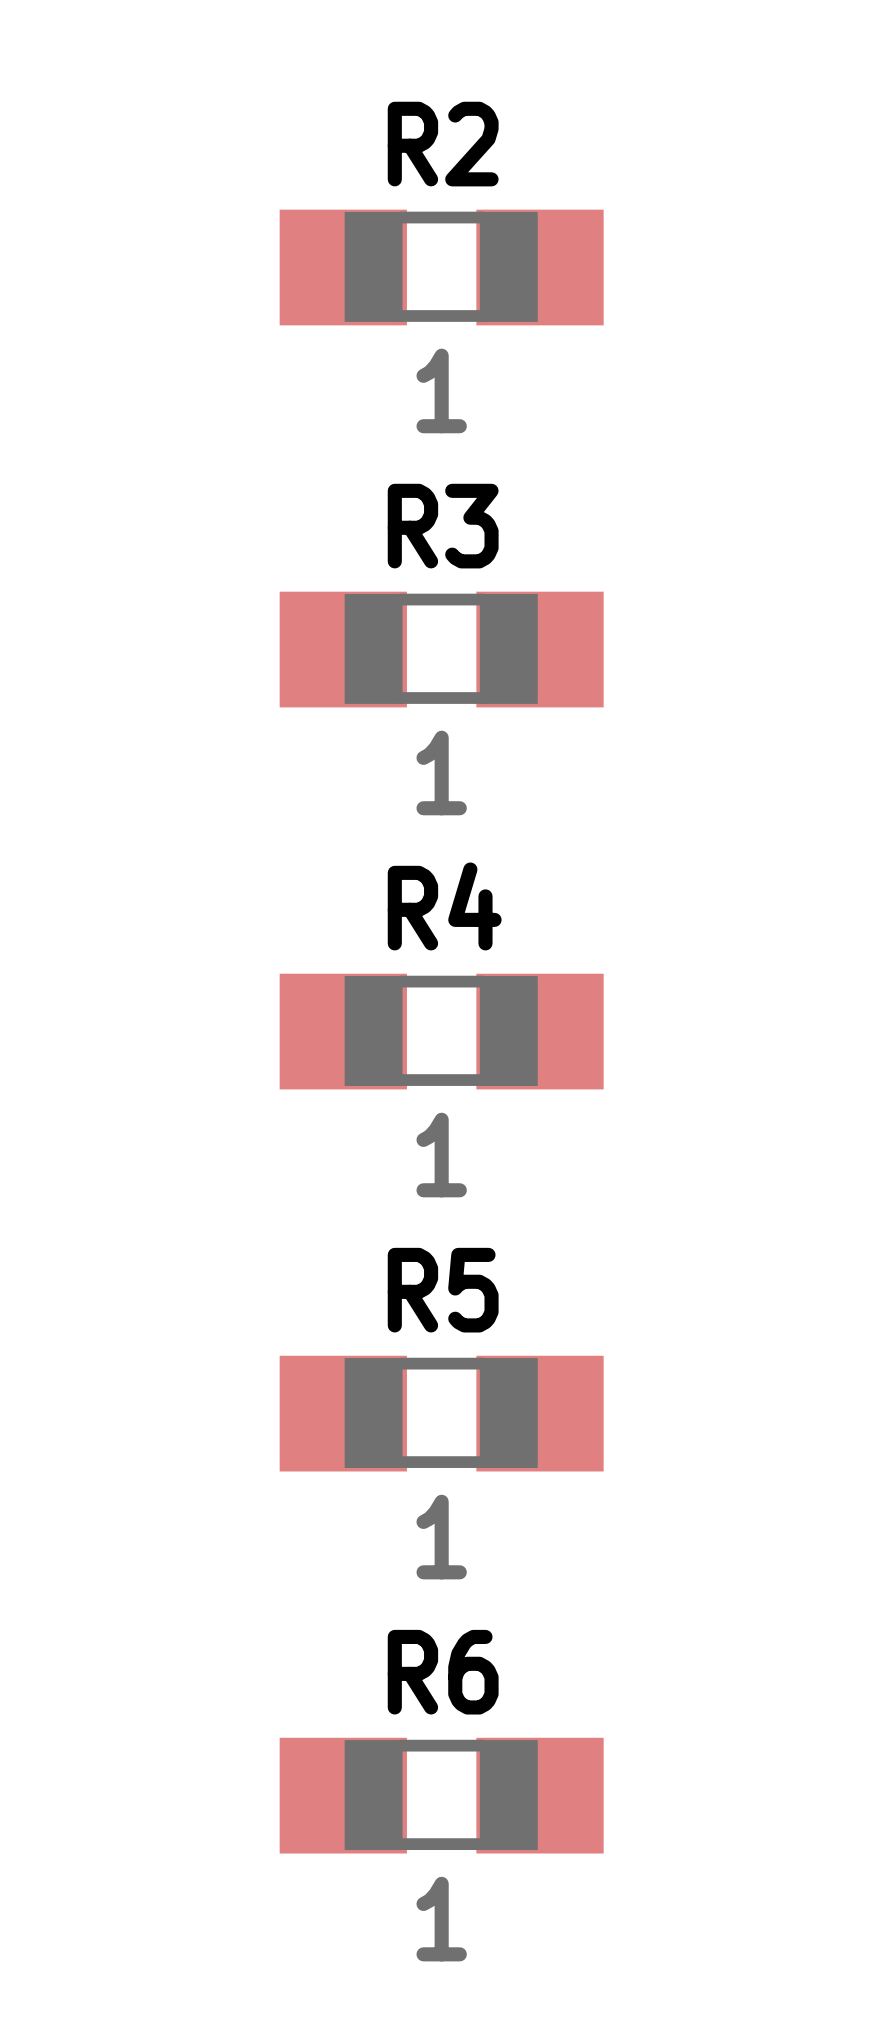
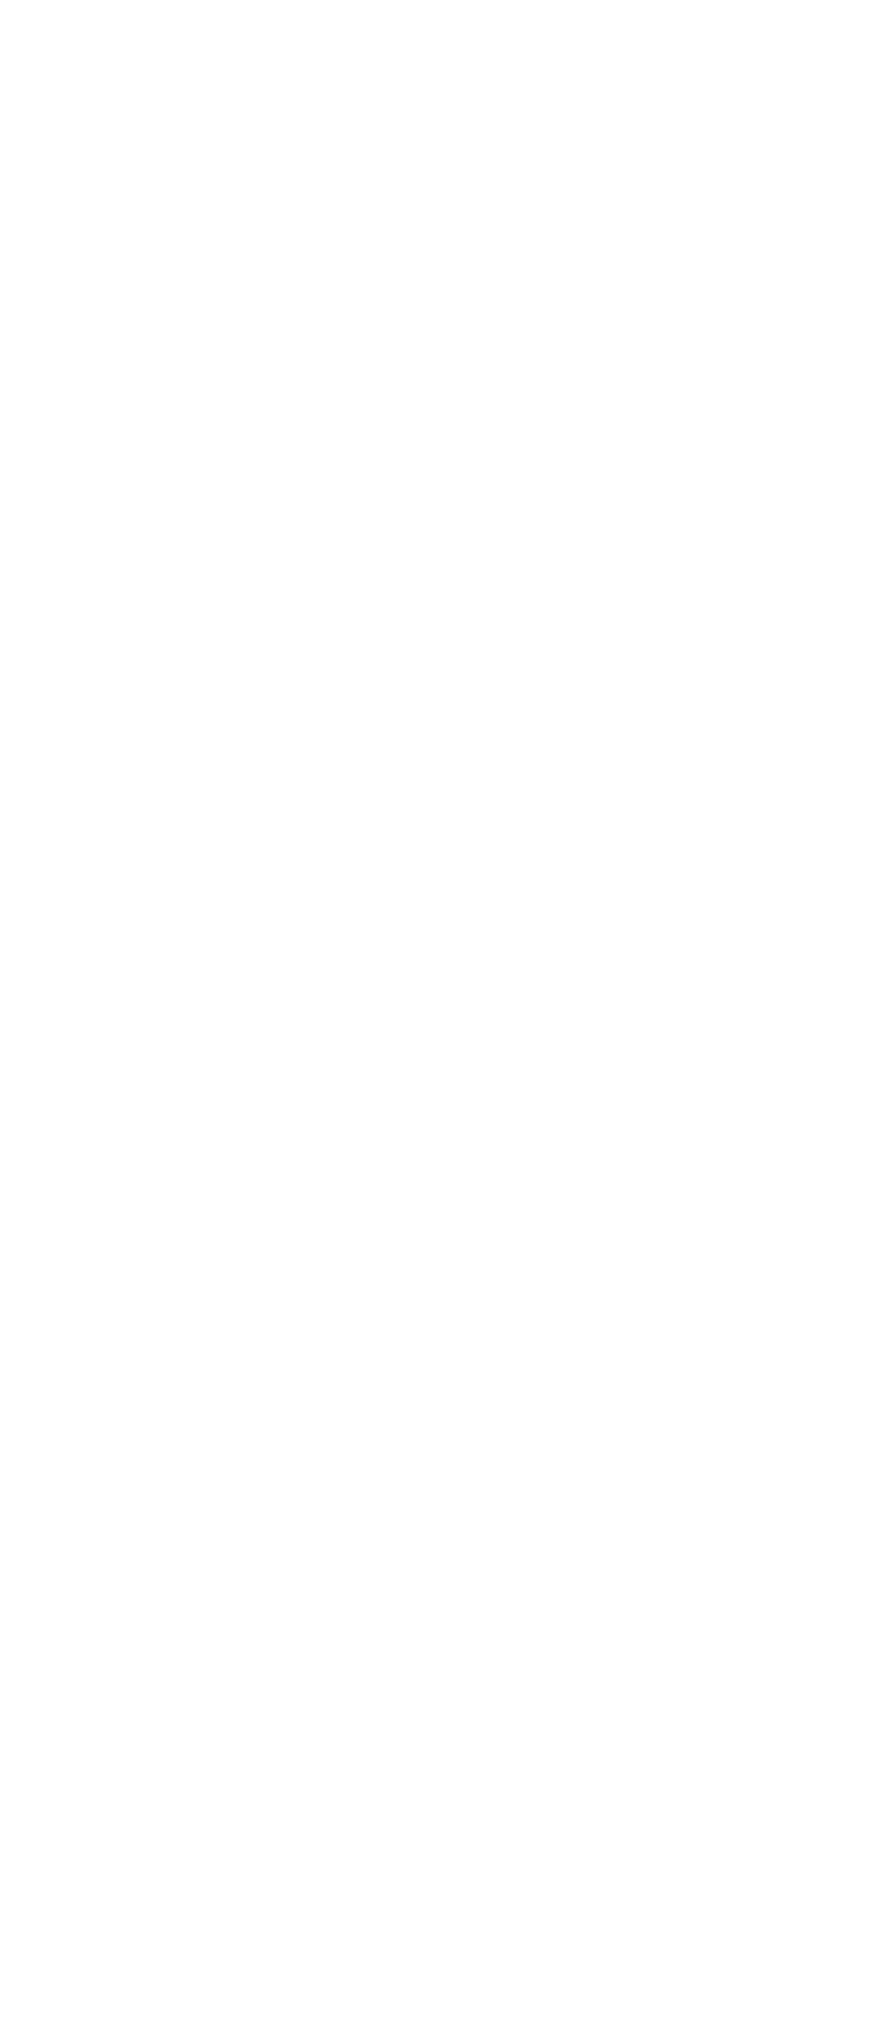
R2: 1 (441, 267) -> none
R3: 1 (441, 649) -> none
R4: 1 (441, 1031) -> none
R5: 1 (441, 1413) -> none
R6: 1 (441, 1795) -> none

